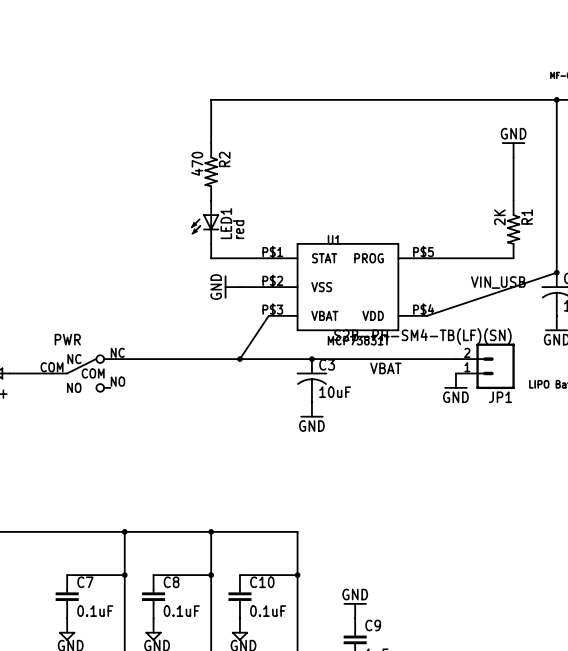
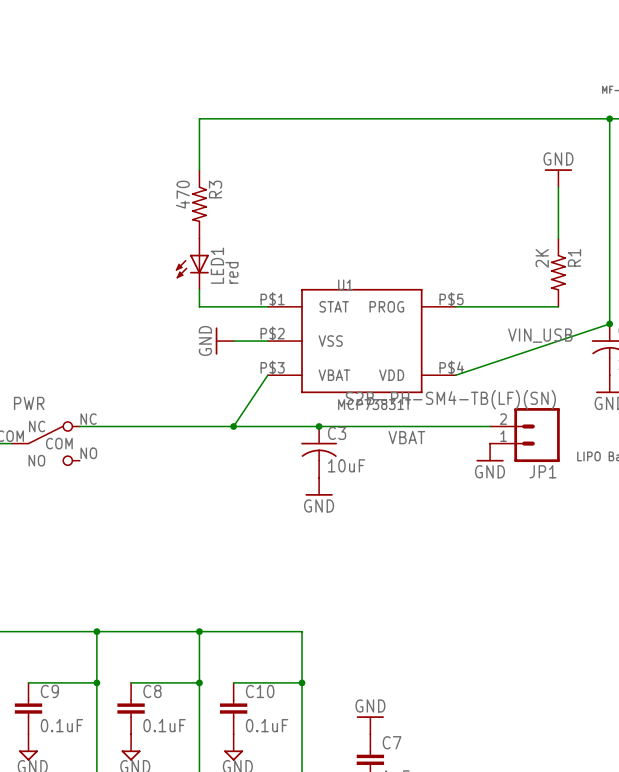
R2 name: R2 (224, 159) -> R3 (215, 189)
C7 name: C7 (85, 582) -> C9 (49, 691)
C9 name: C9 (373, 625) -> C7 (392, 742)

